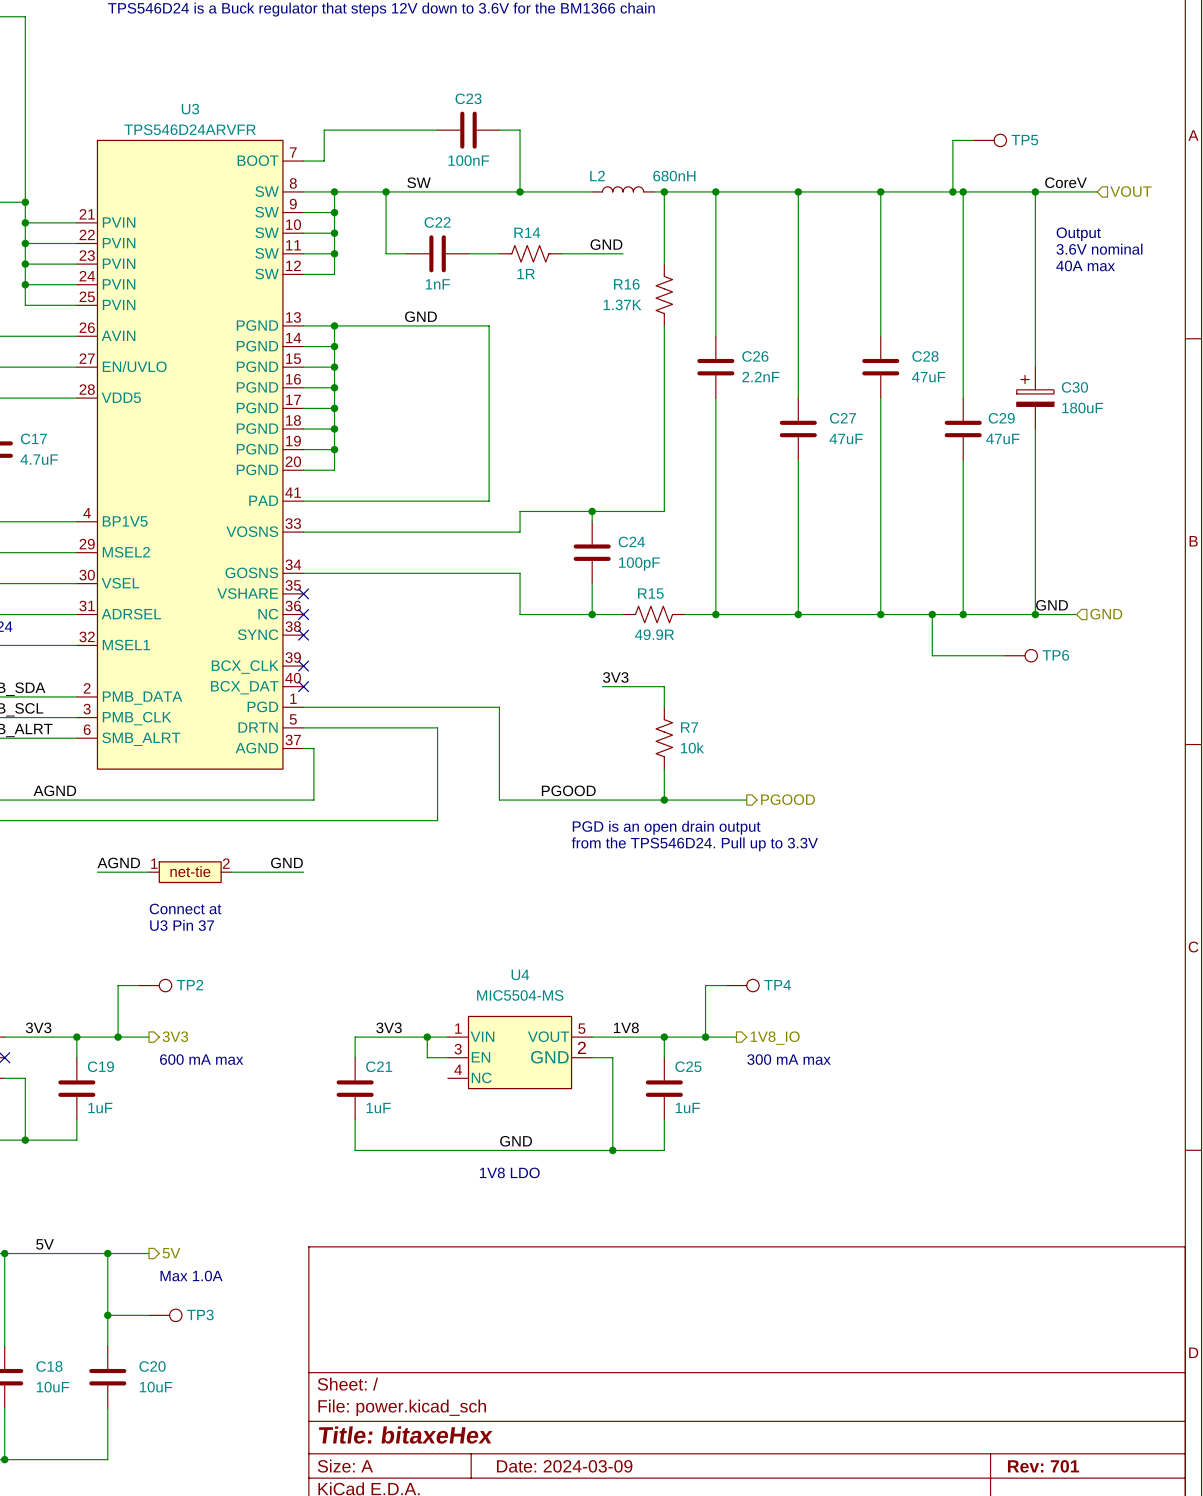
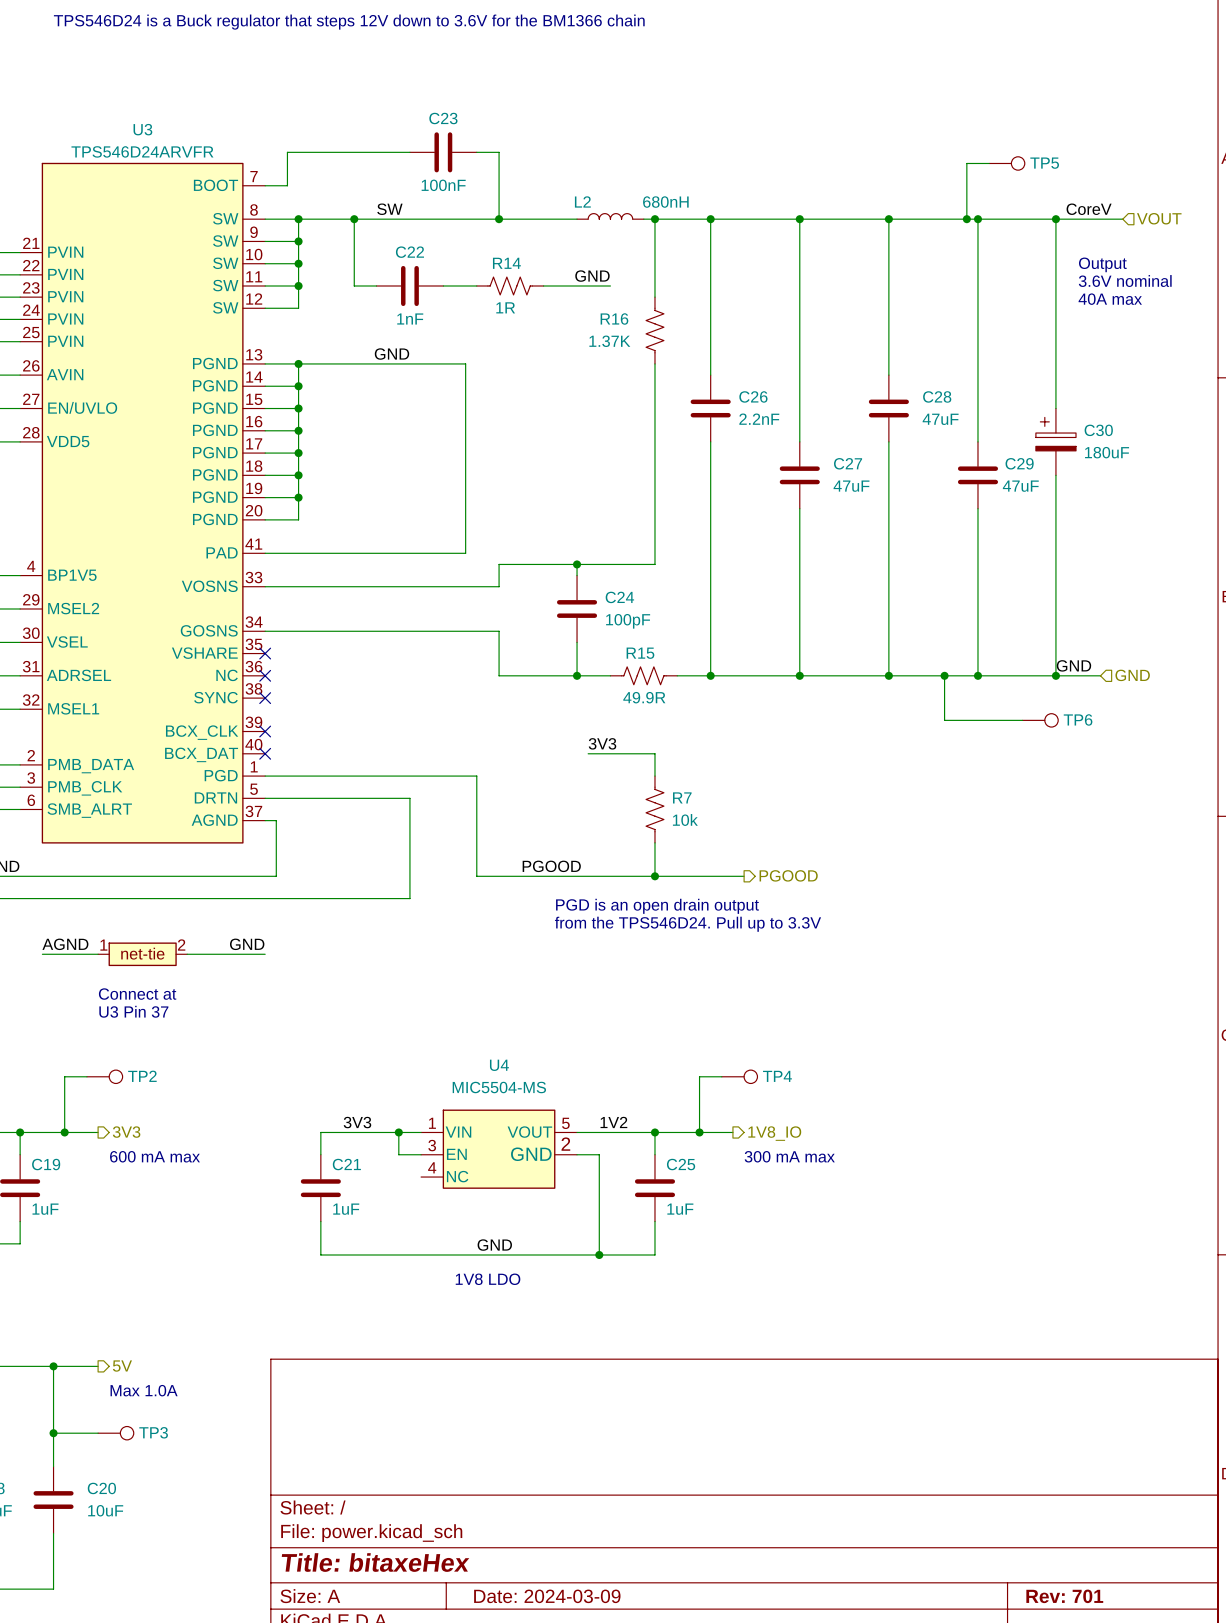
label: 1V8 (626, 1027) -> 1V2 (613, 1122)

